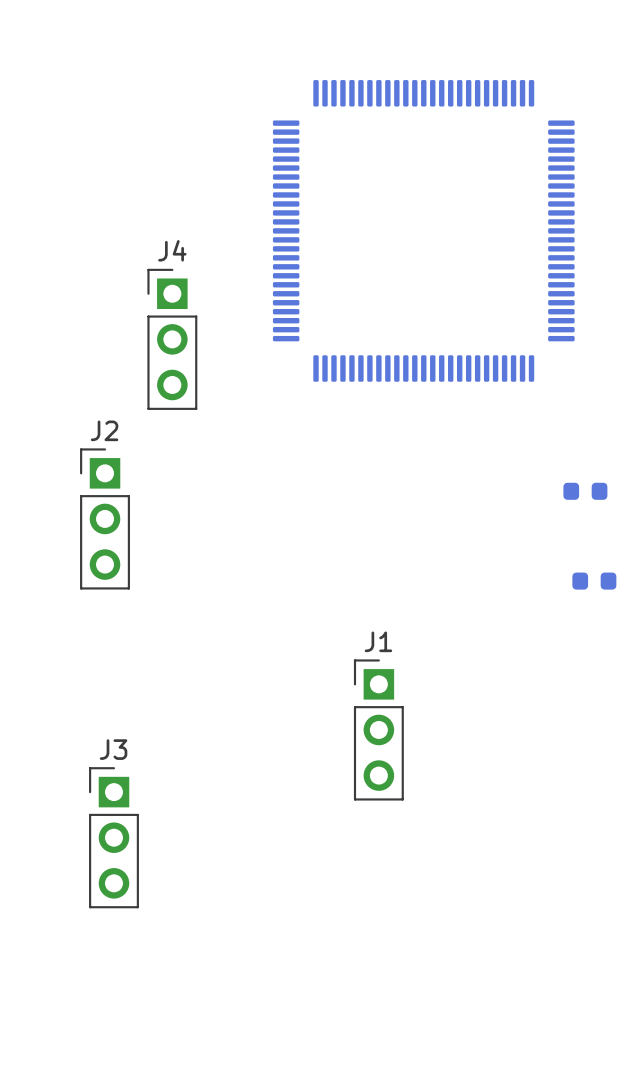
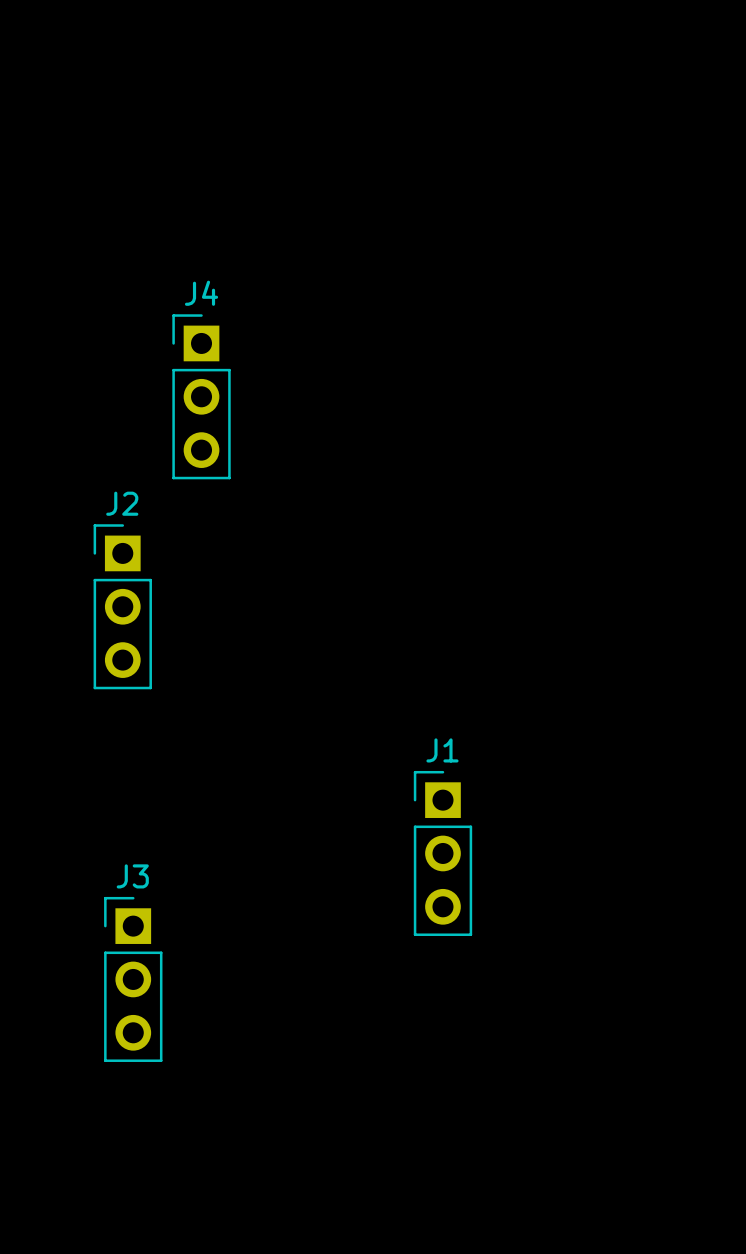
part: (423, 230) -> none
part: (585, 491) -> none
part: (594, 581) -> none

